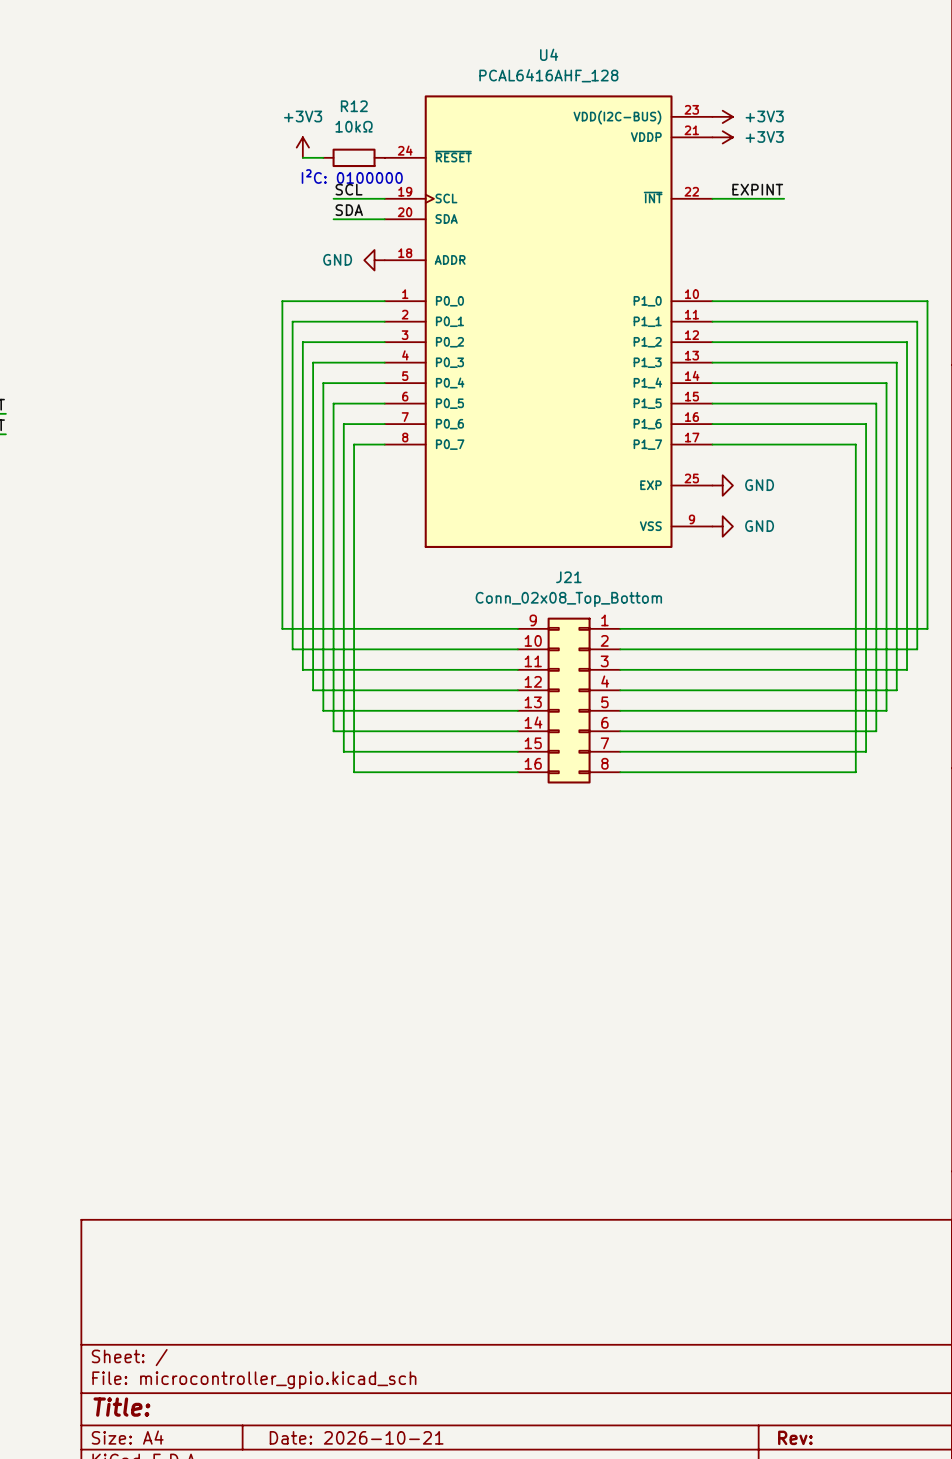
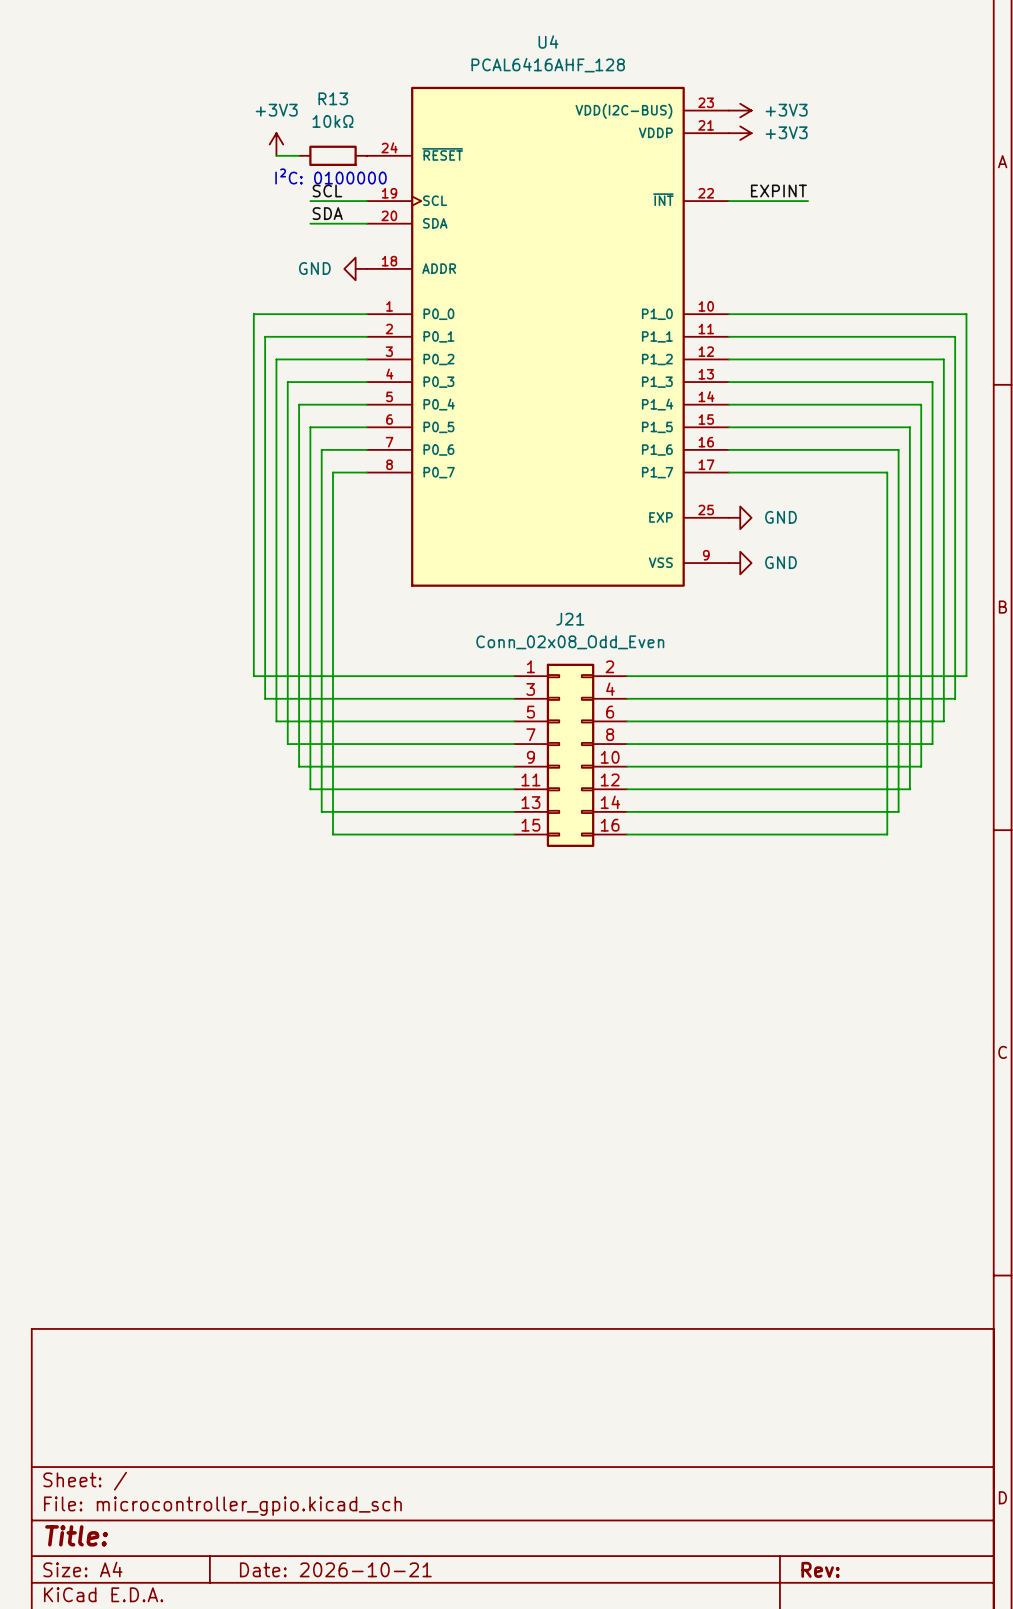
R12 name: R12 (354, 106) -> R13 (333, 98)
J21 value: Conn_02x08_Top_Bottom (568, 599) -> Conn_02x08_Odd_Even (570, 642)
J21 symbol: [517, 617, 621, 784] -> [513, 663, 628, 847]

